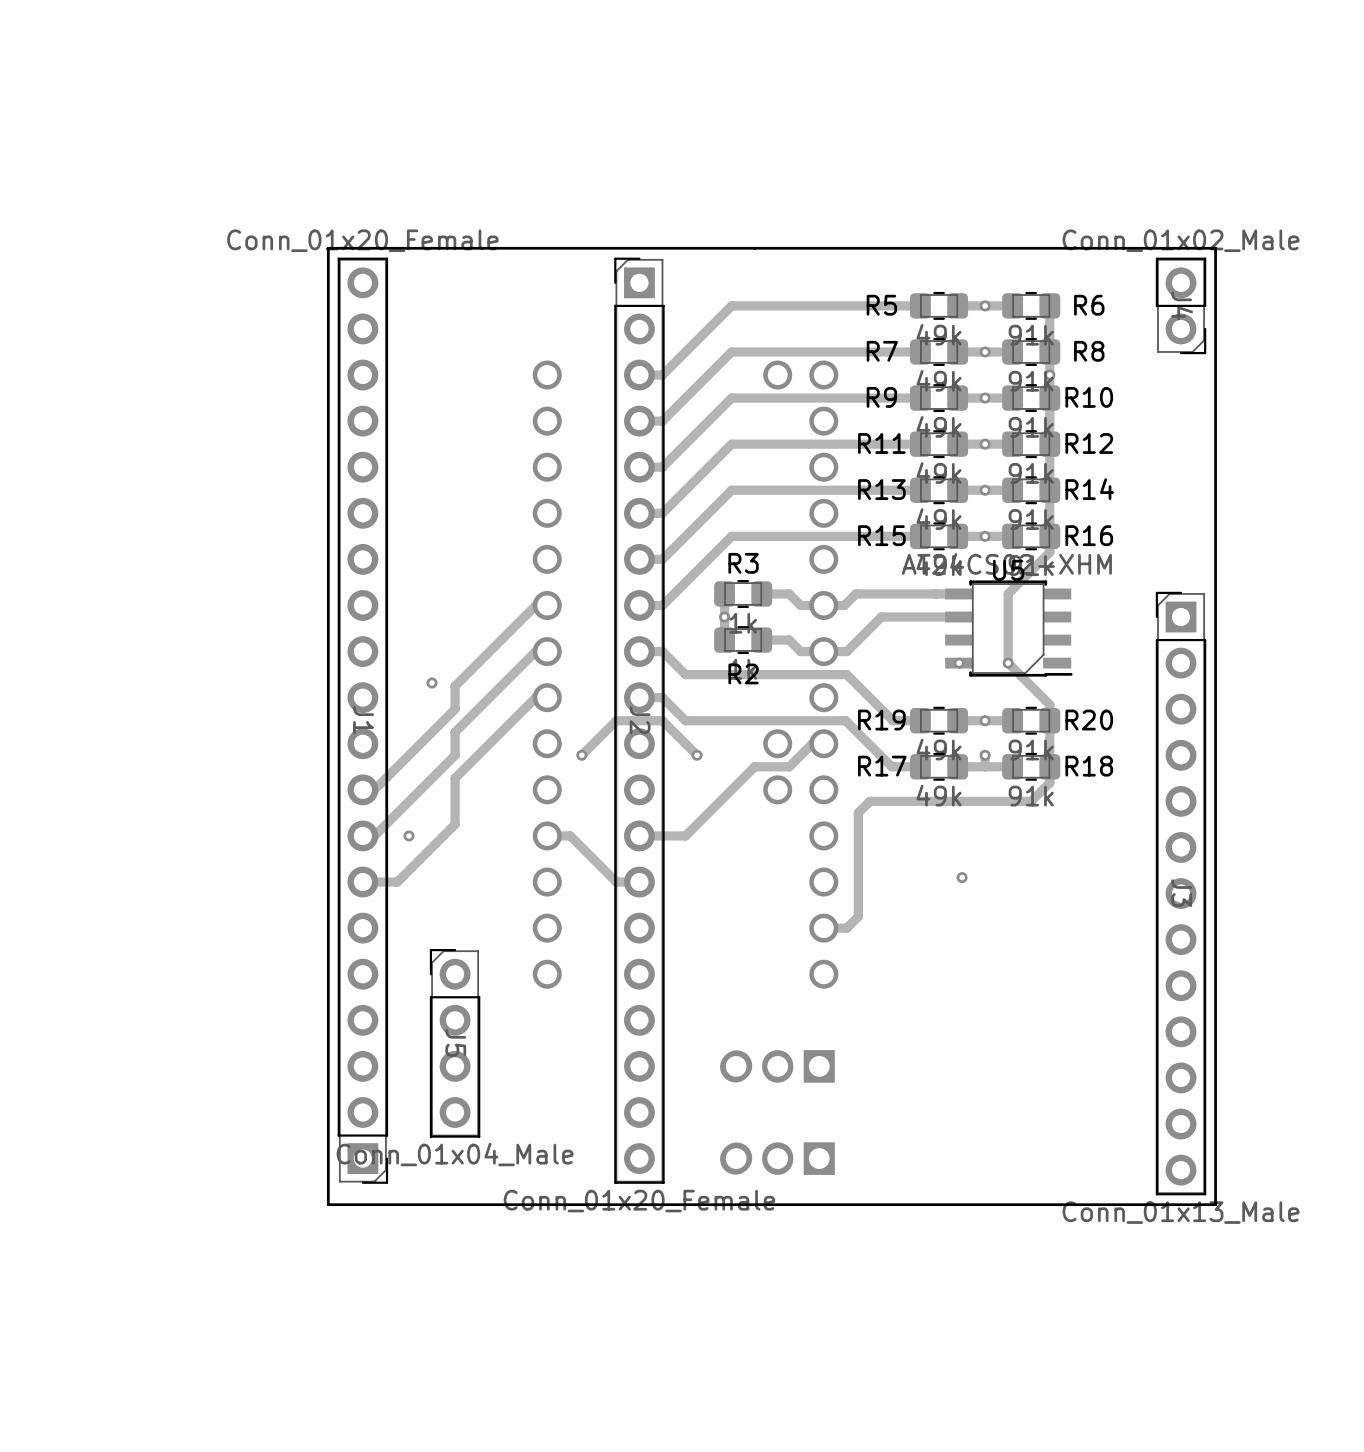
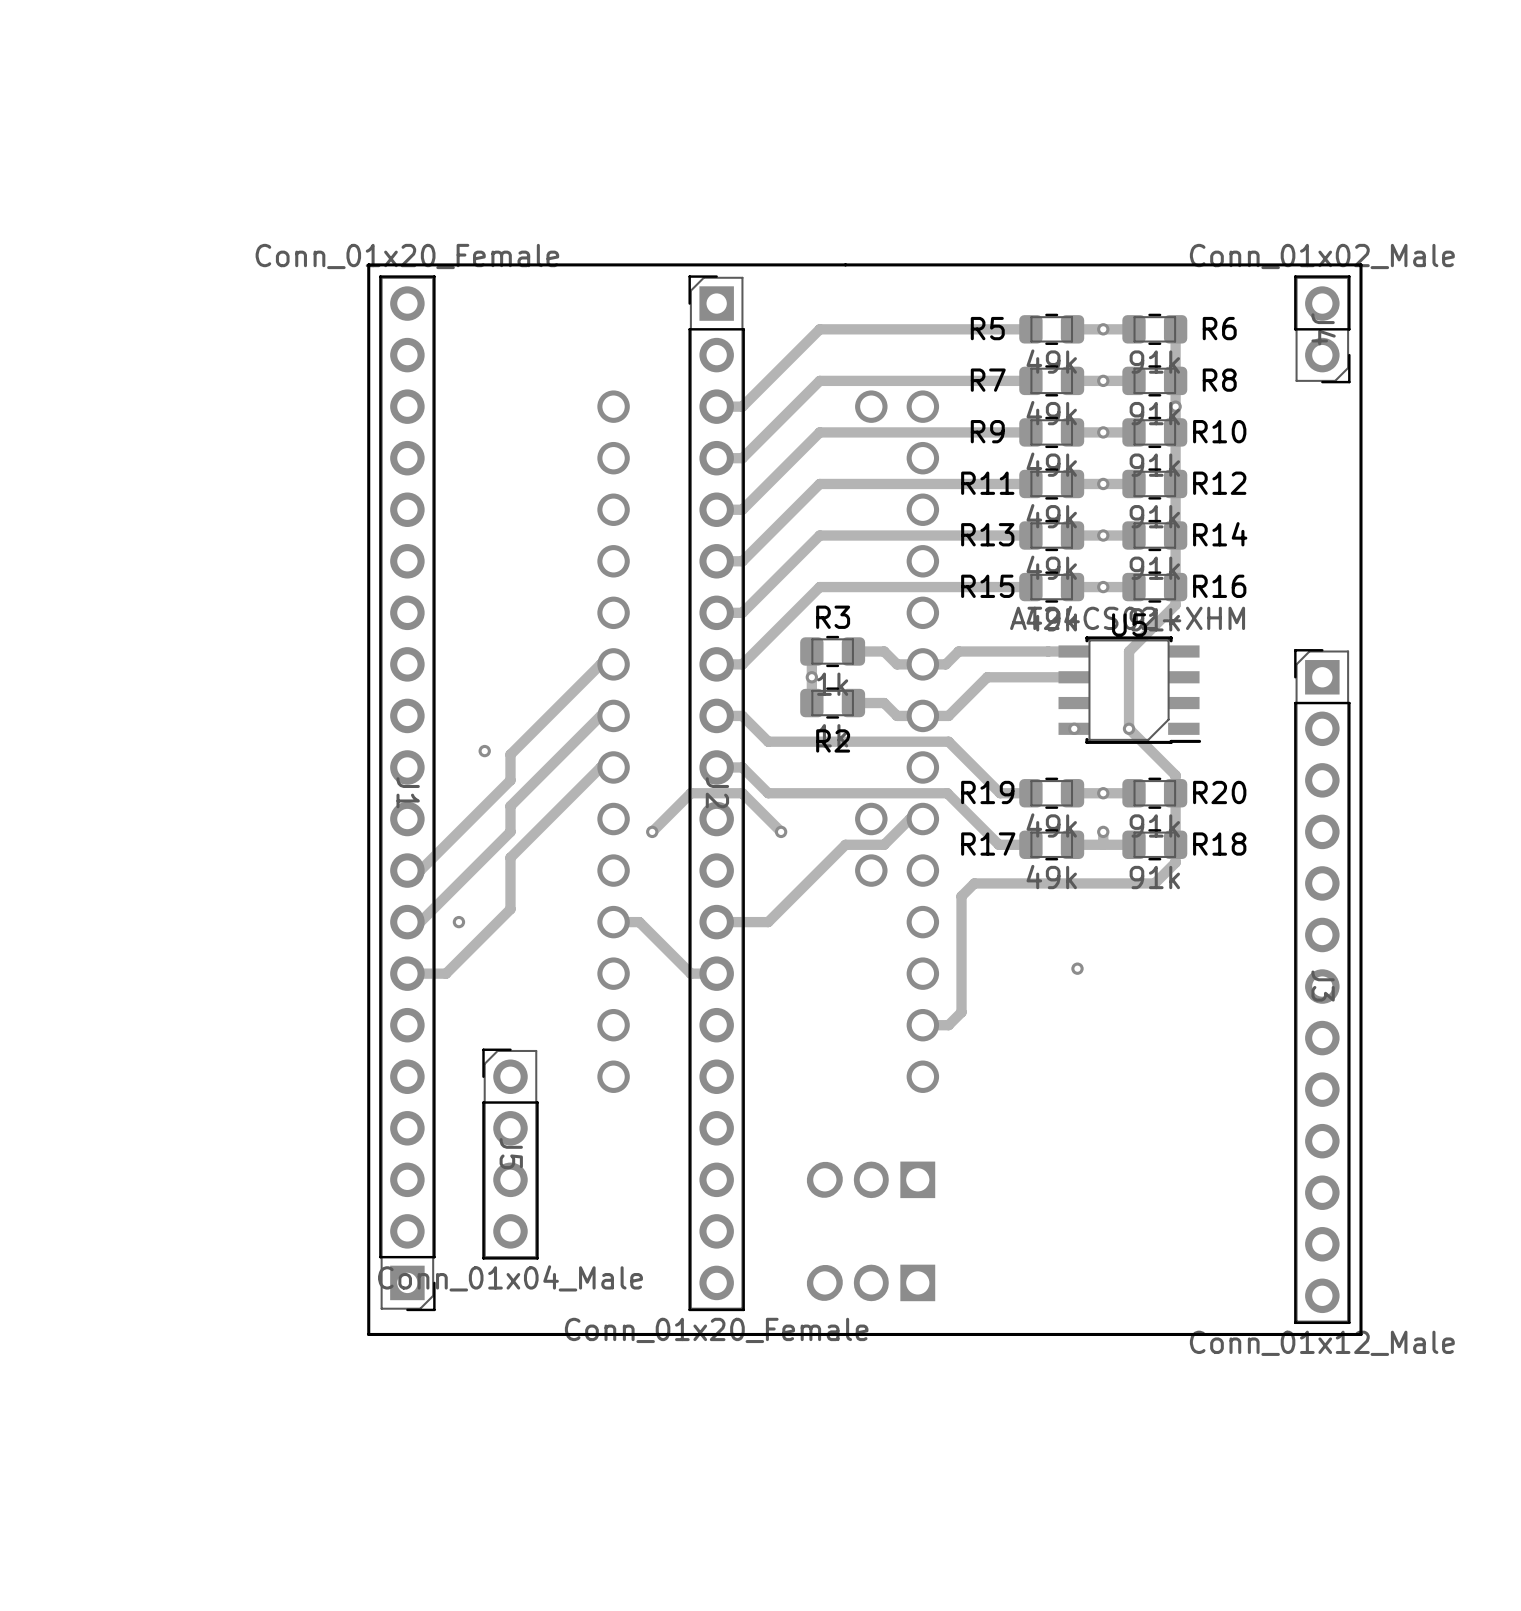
part value: Conn_01x13_Male (1181, 1212) -> Conn_01x12_Male (1322, 1343)

